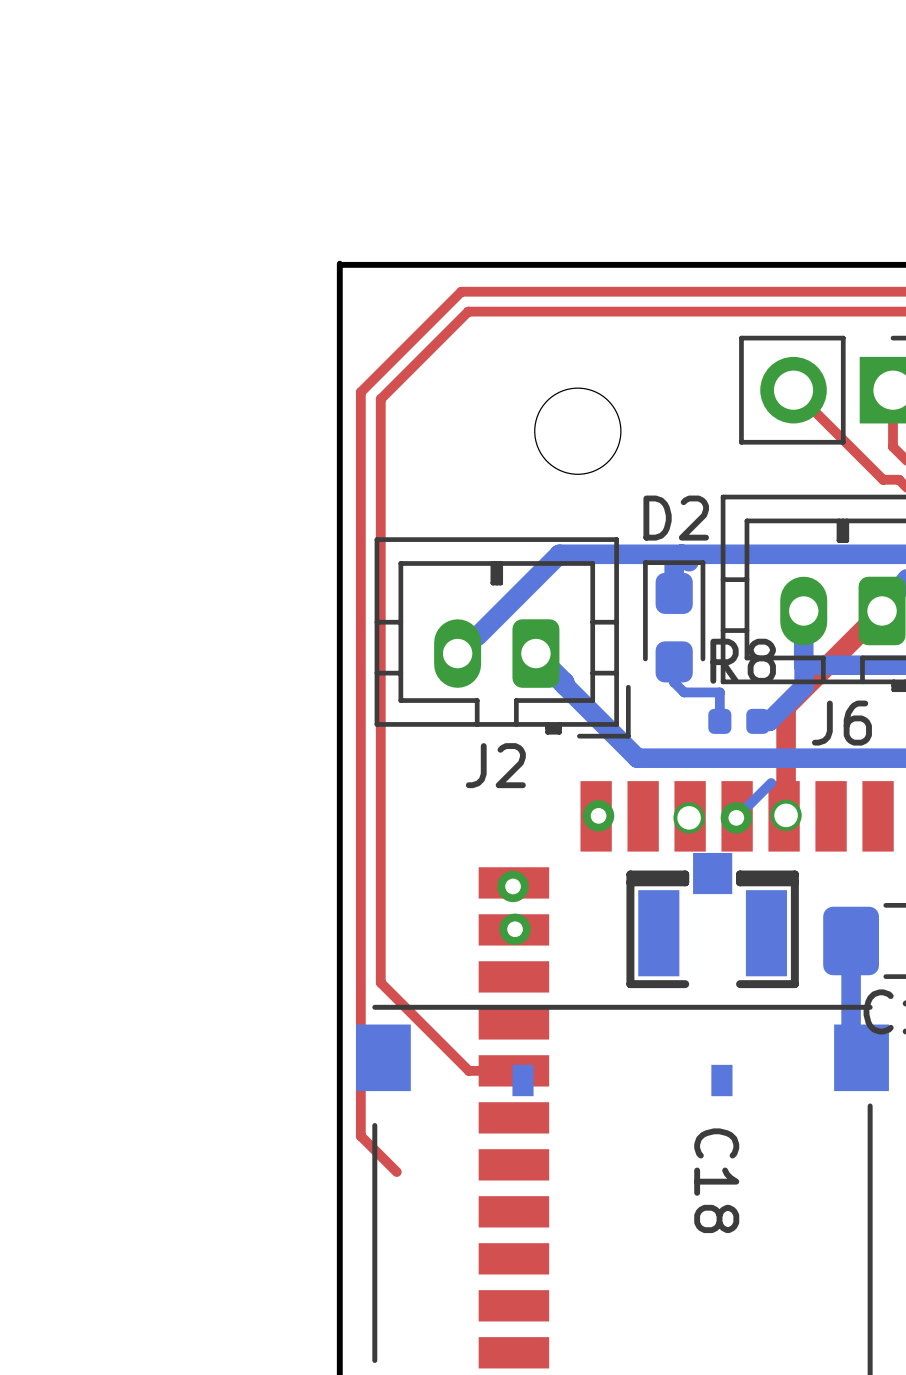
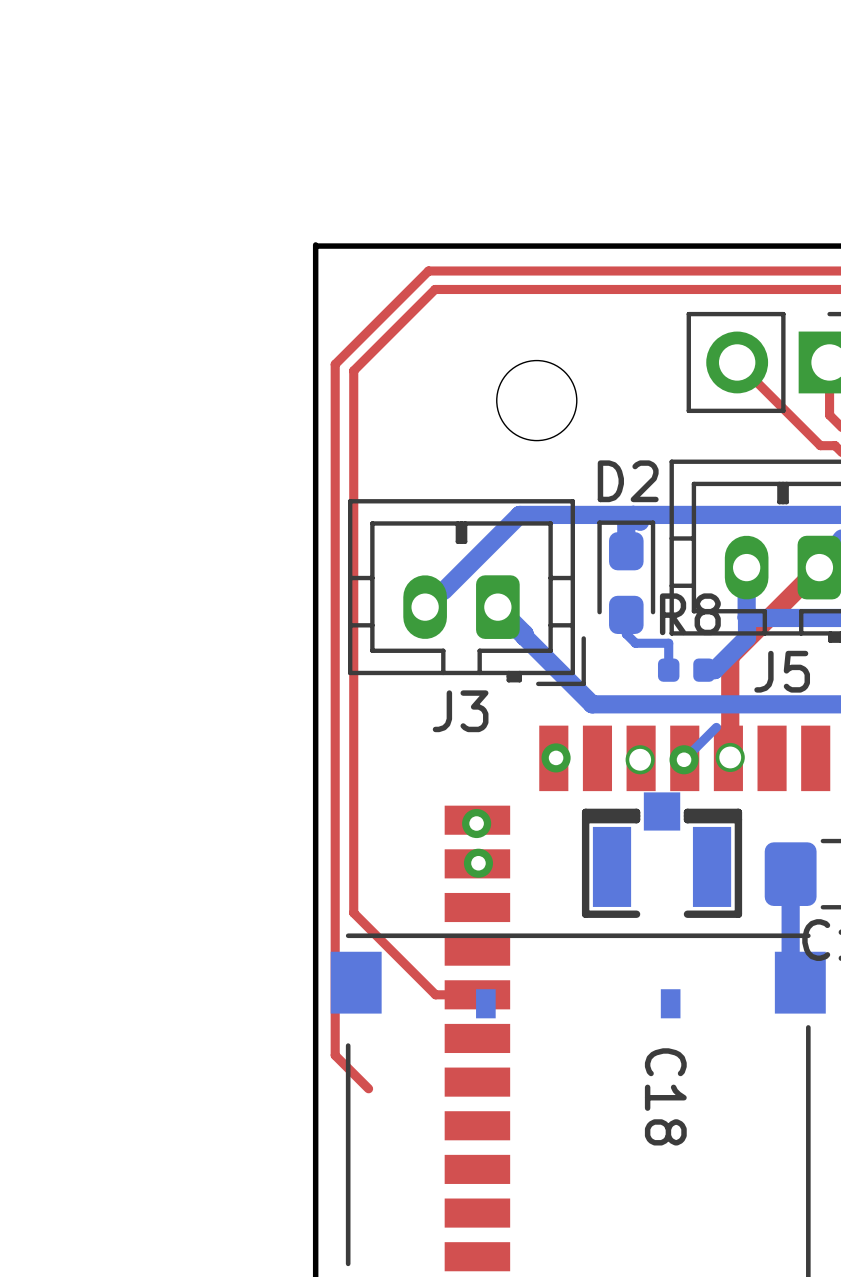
J6 name: J6 (841, 723) -> J5 (782, 671)
J2 name: J2 (495, 765) -> J3 (460, 711)

